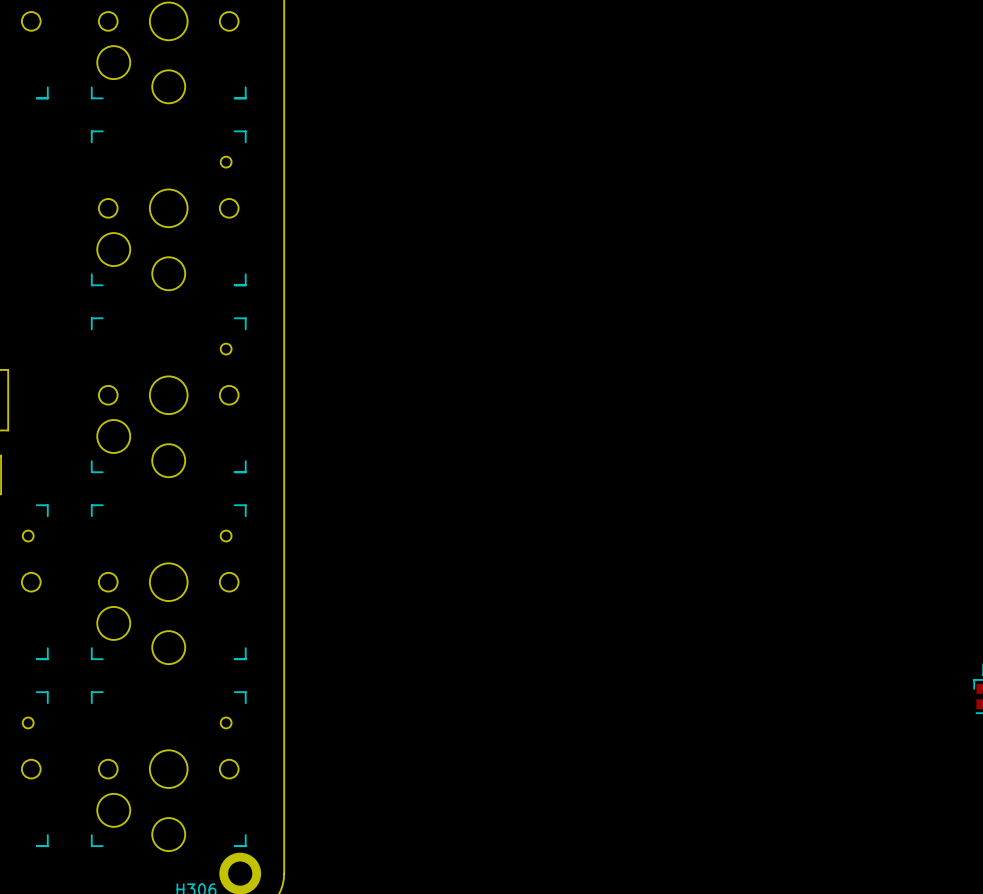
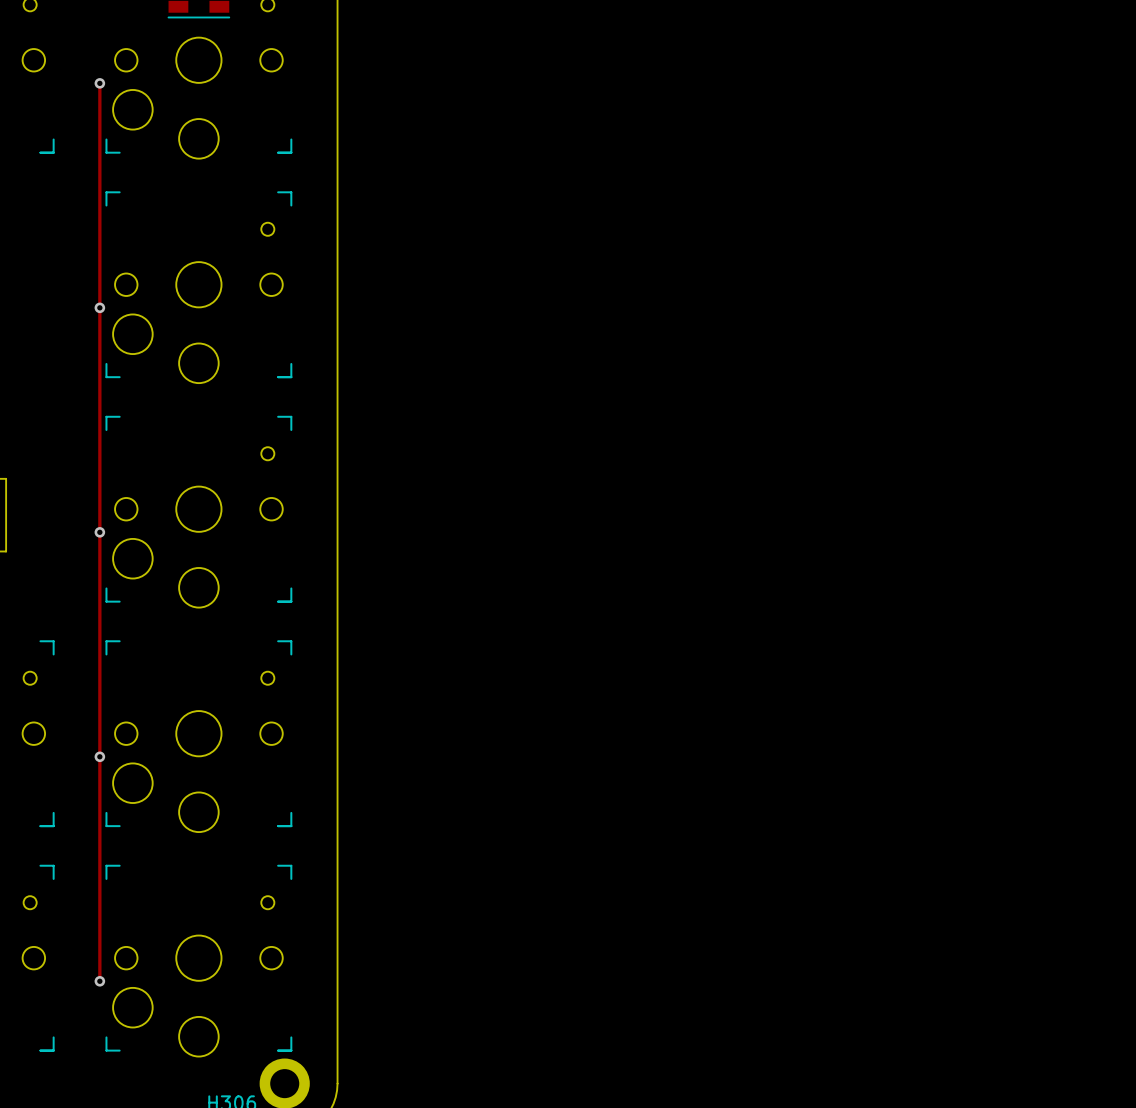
track: none -> (99, 83) (99, 981)
via: none -> (99, 83)
via: none -> (99, 307)
via: none -> (99, 532)
via: none -> (99, 756)
via: none -> (99, 981)

